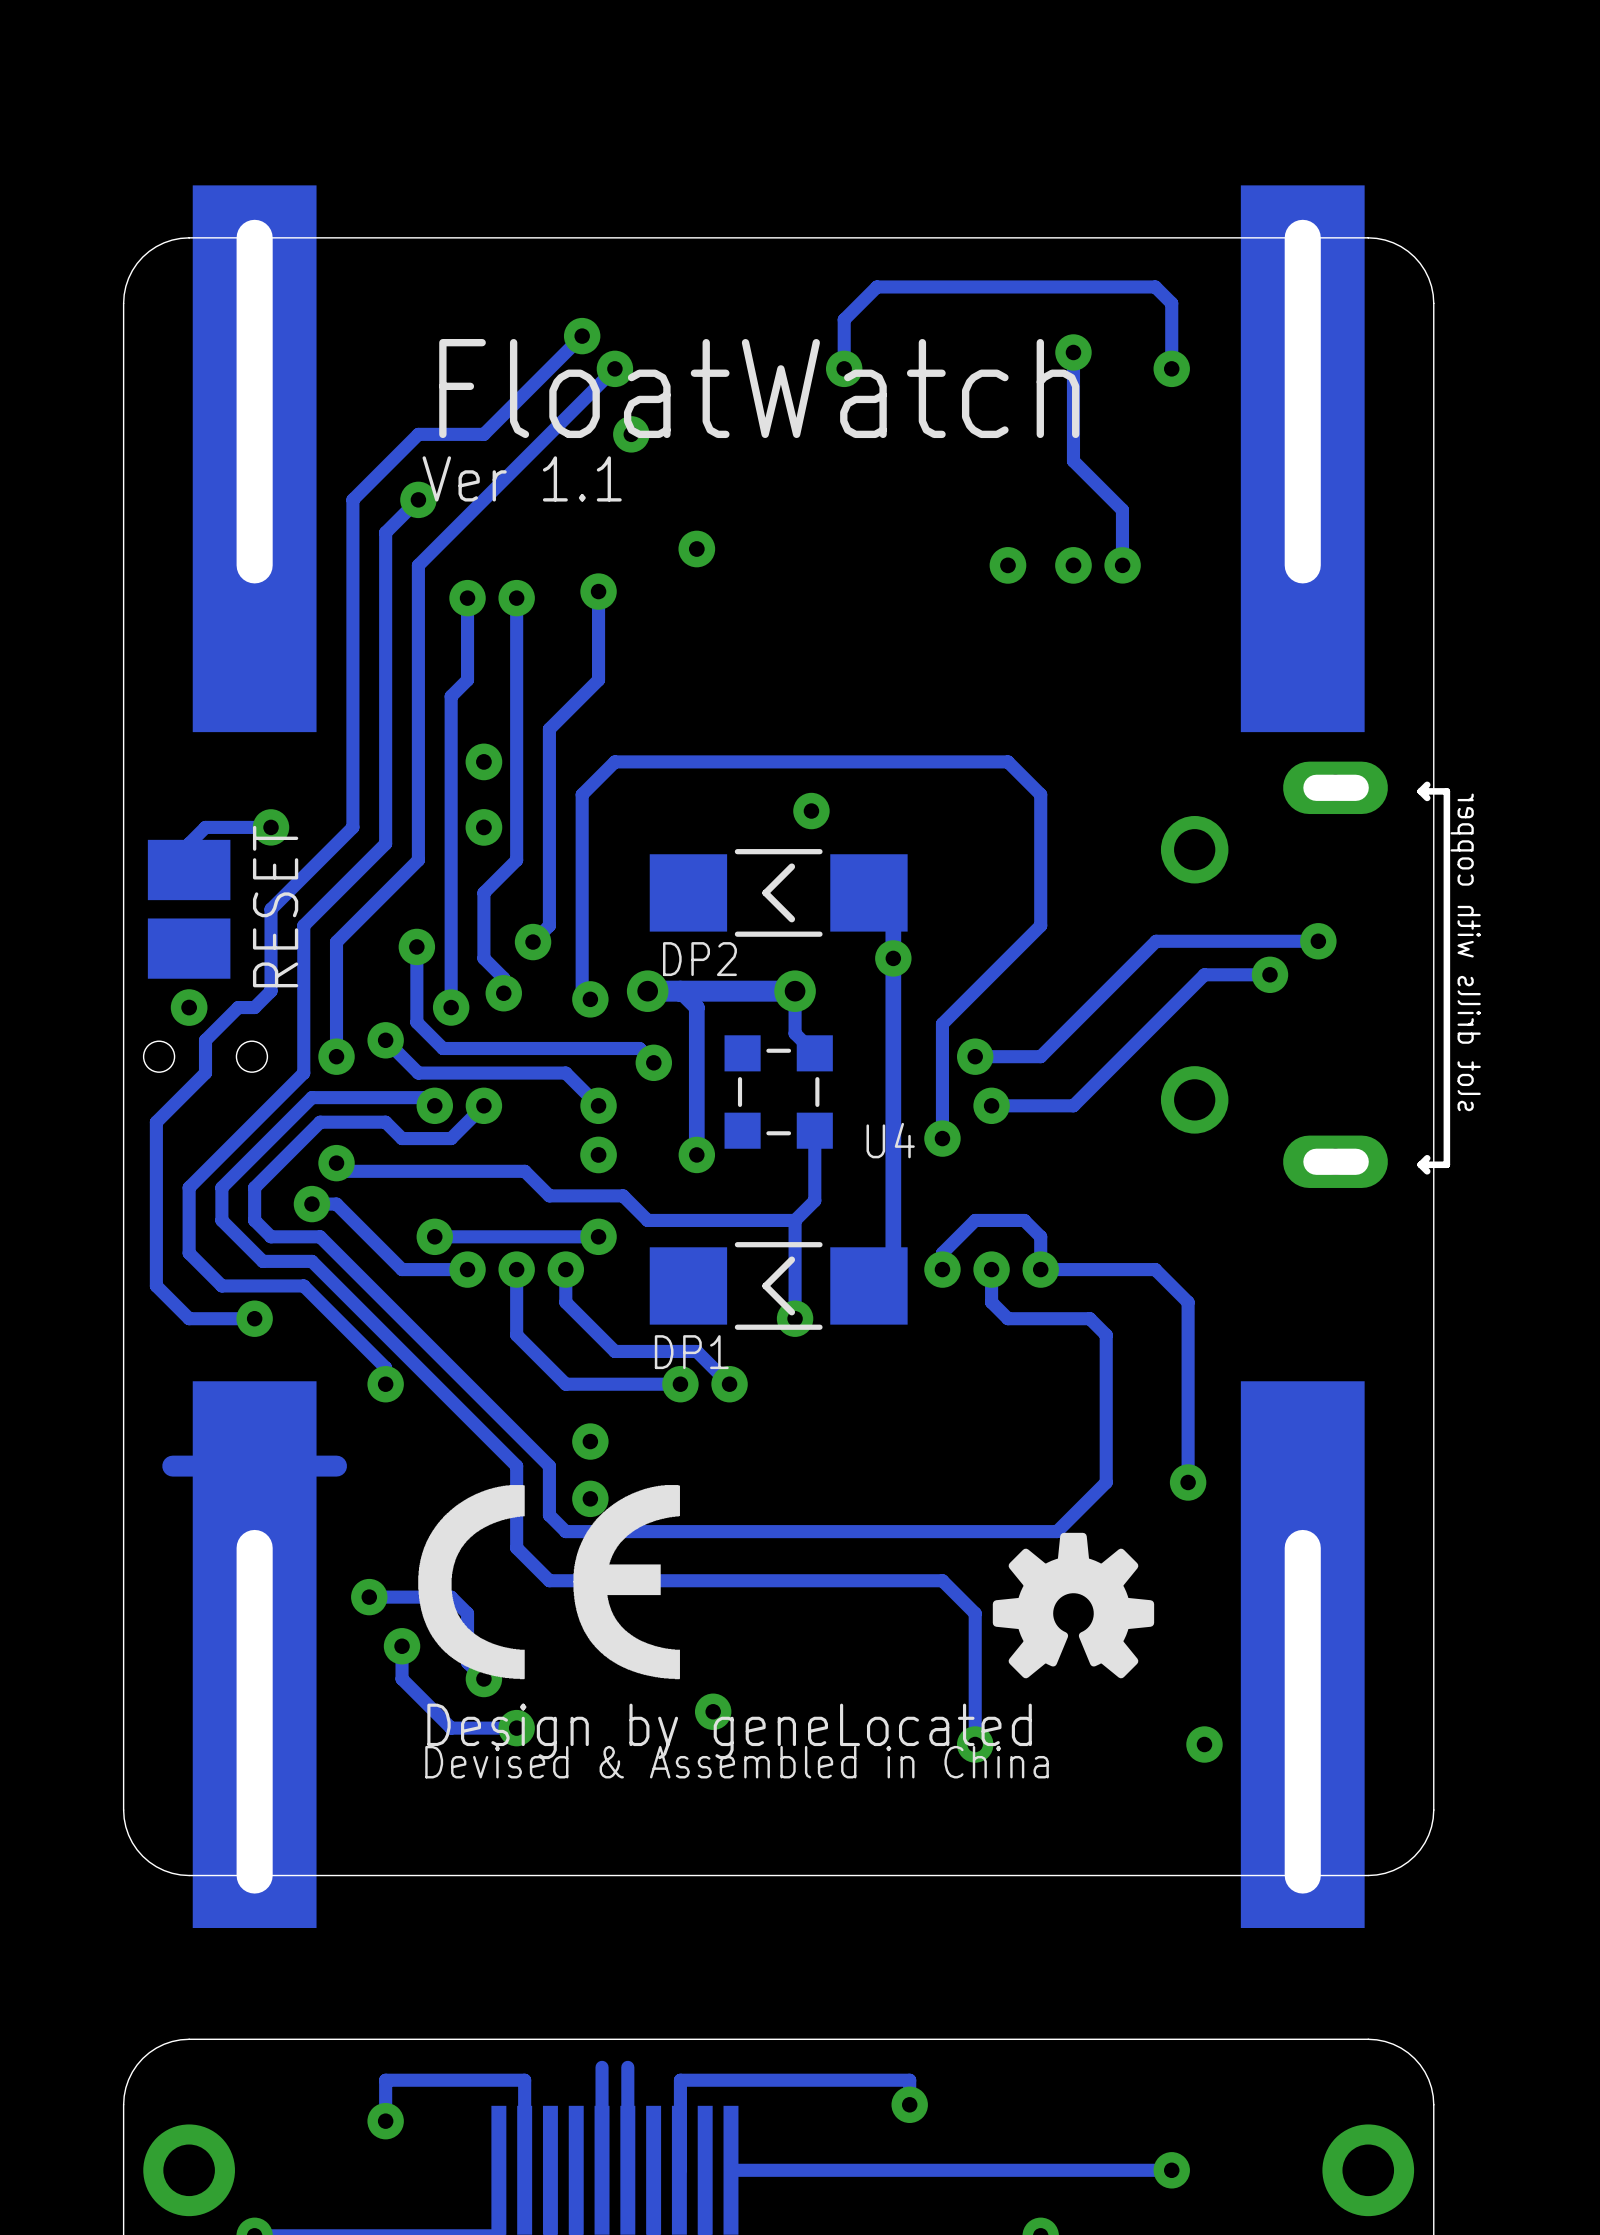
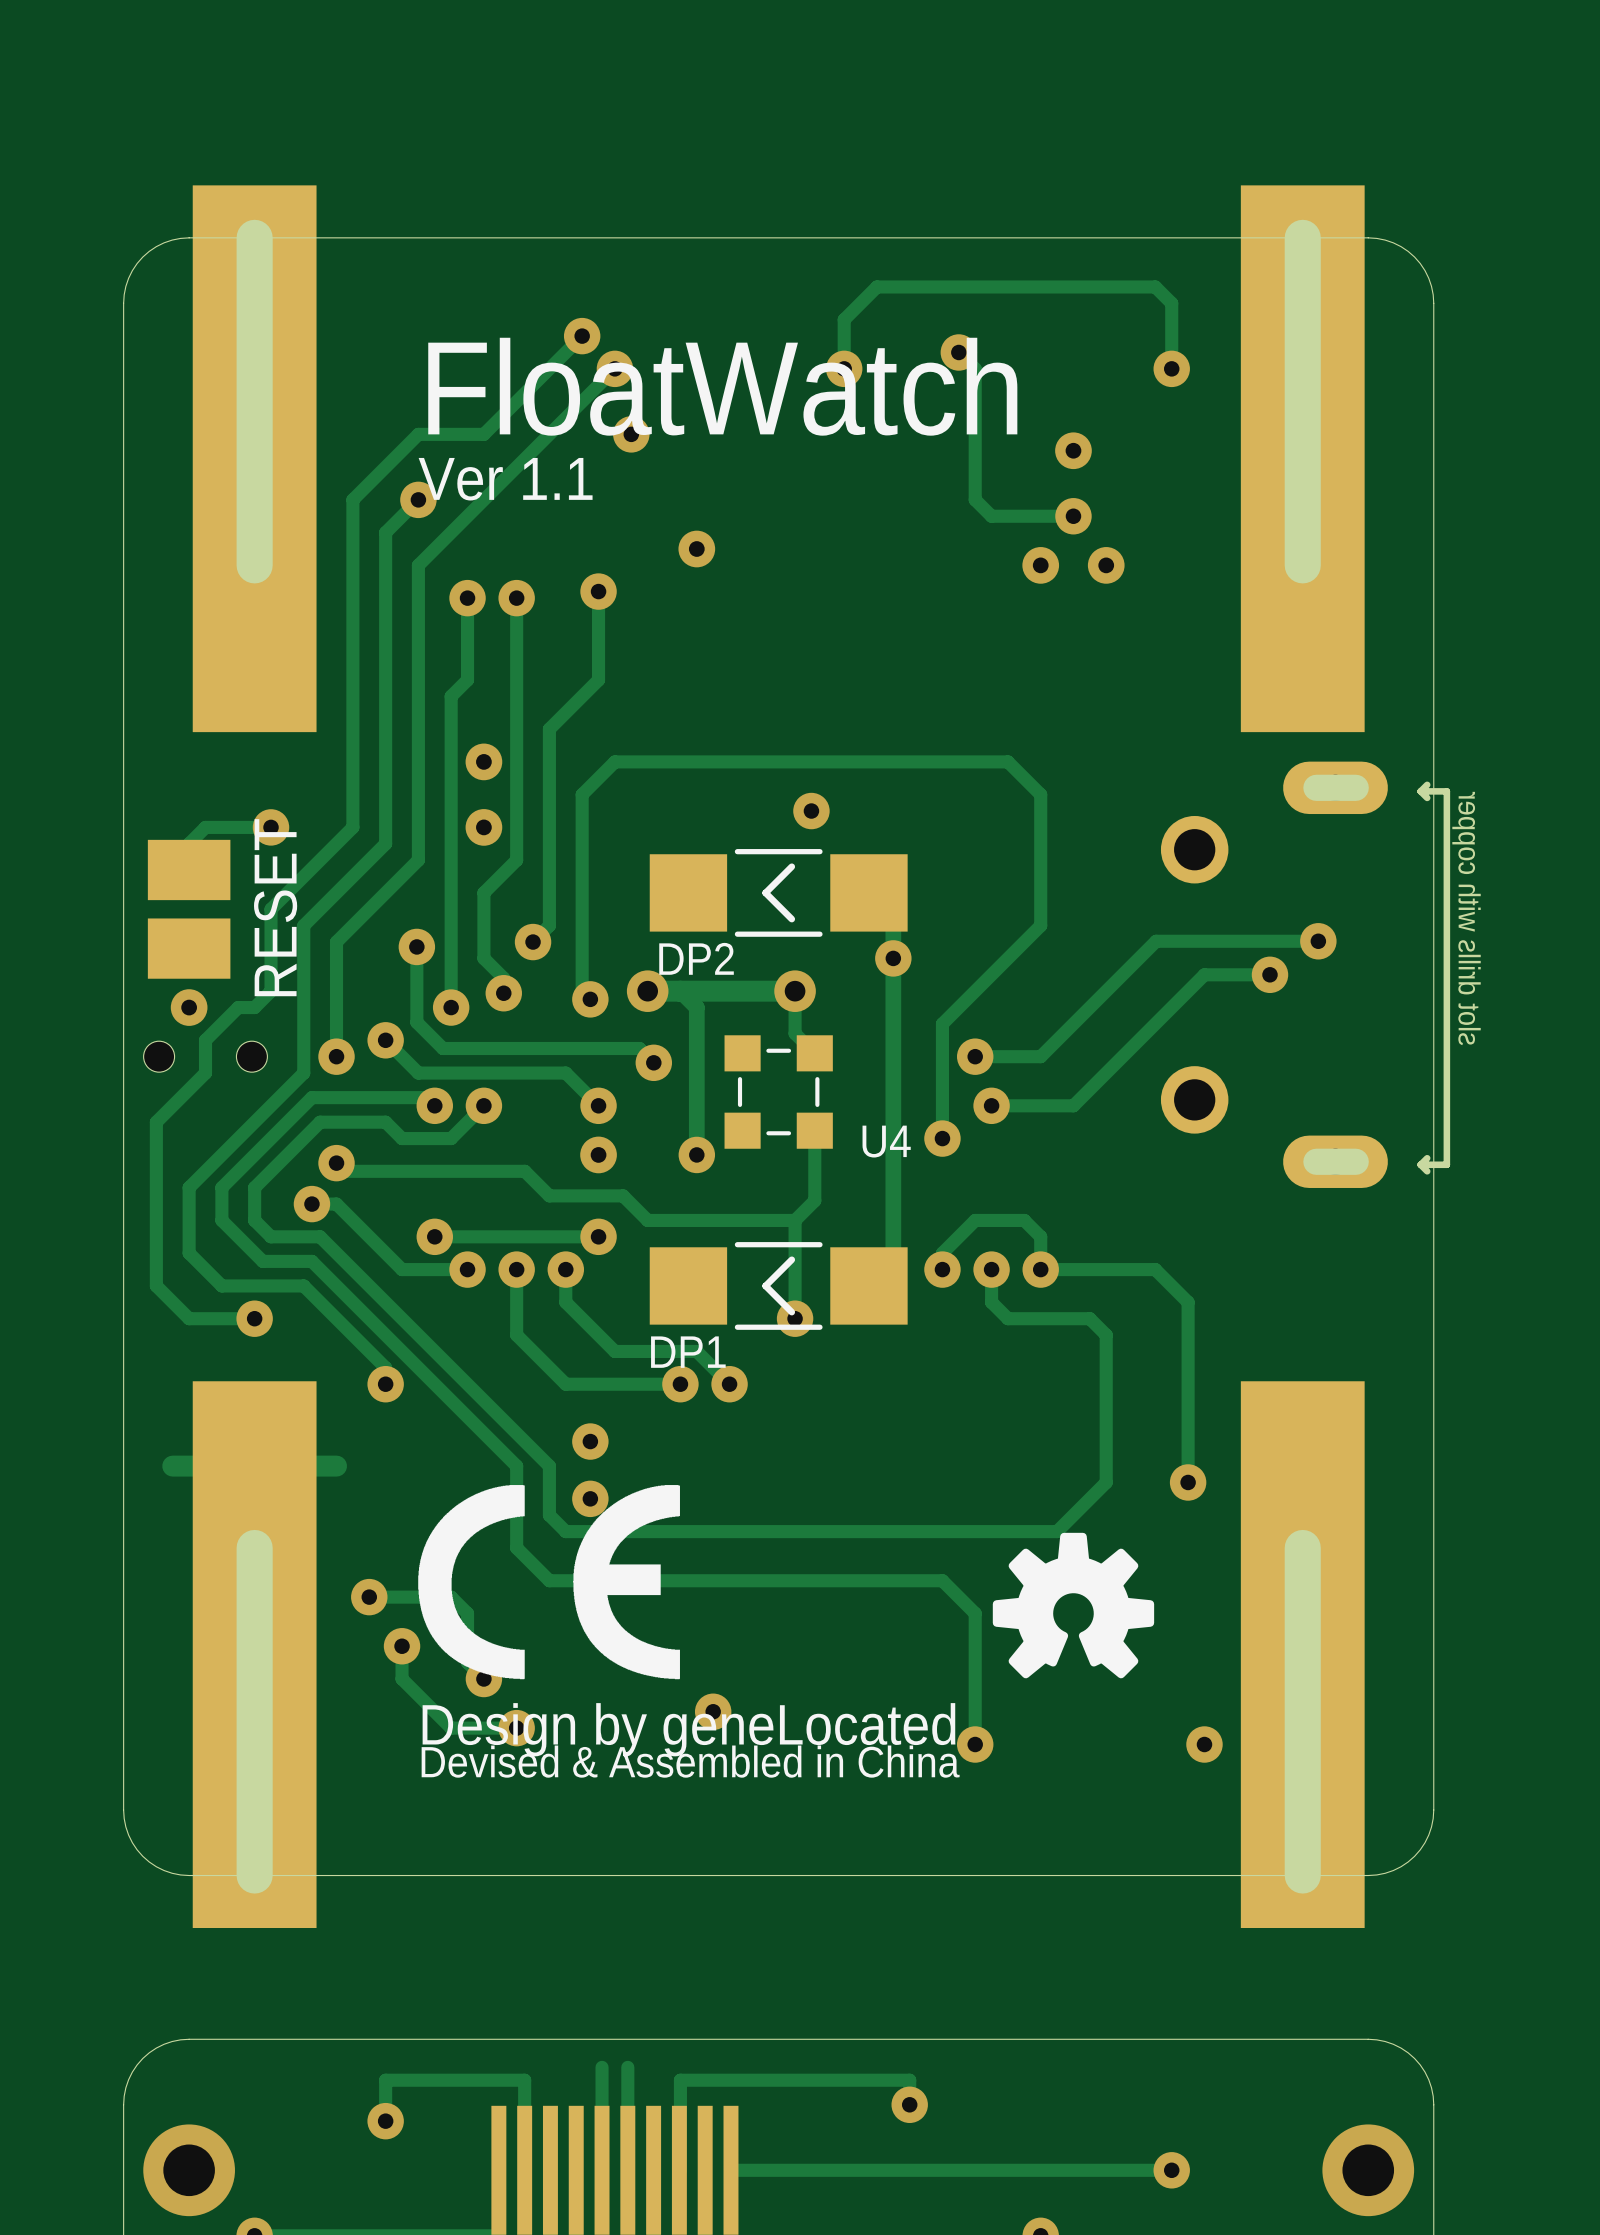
track: none -> (958, 352) (975, 368) (975, 499) (991, 516) (1073, 516)
via: none -> (958, 352)
track: (1073, 352) (1073, 461) (1122, 510) (1122, 565) -> none
via: (1073, 352) -> none
via: none -> (1073, 450)
via: (1007, 565) -> none
via: none -> (1040, 565)
via: (1073, 565) -> none
via: none -> (1106, 565)
via position: (1122, 565) -> (1073, 516)

